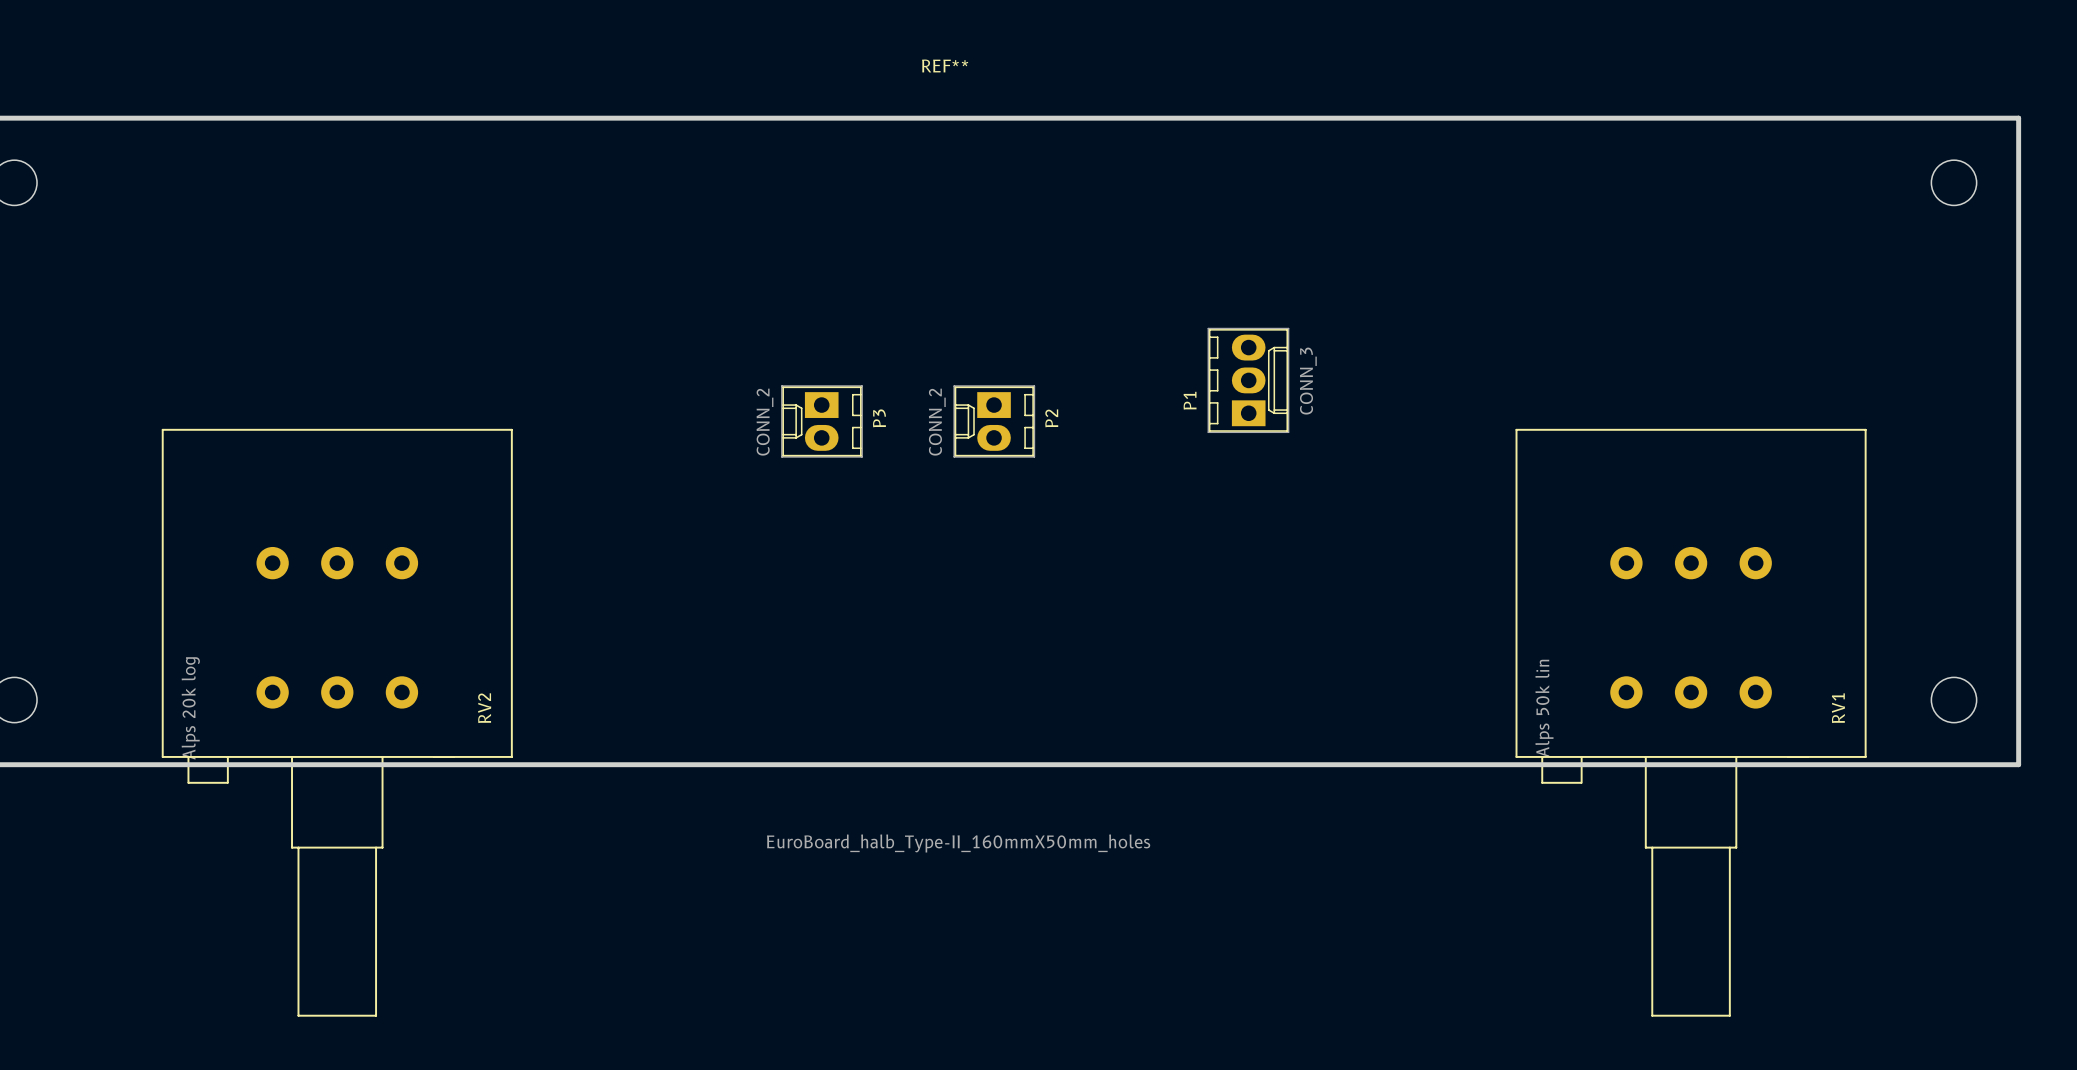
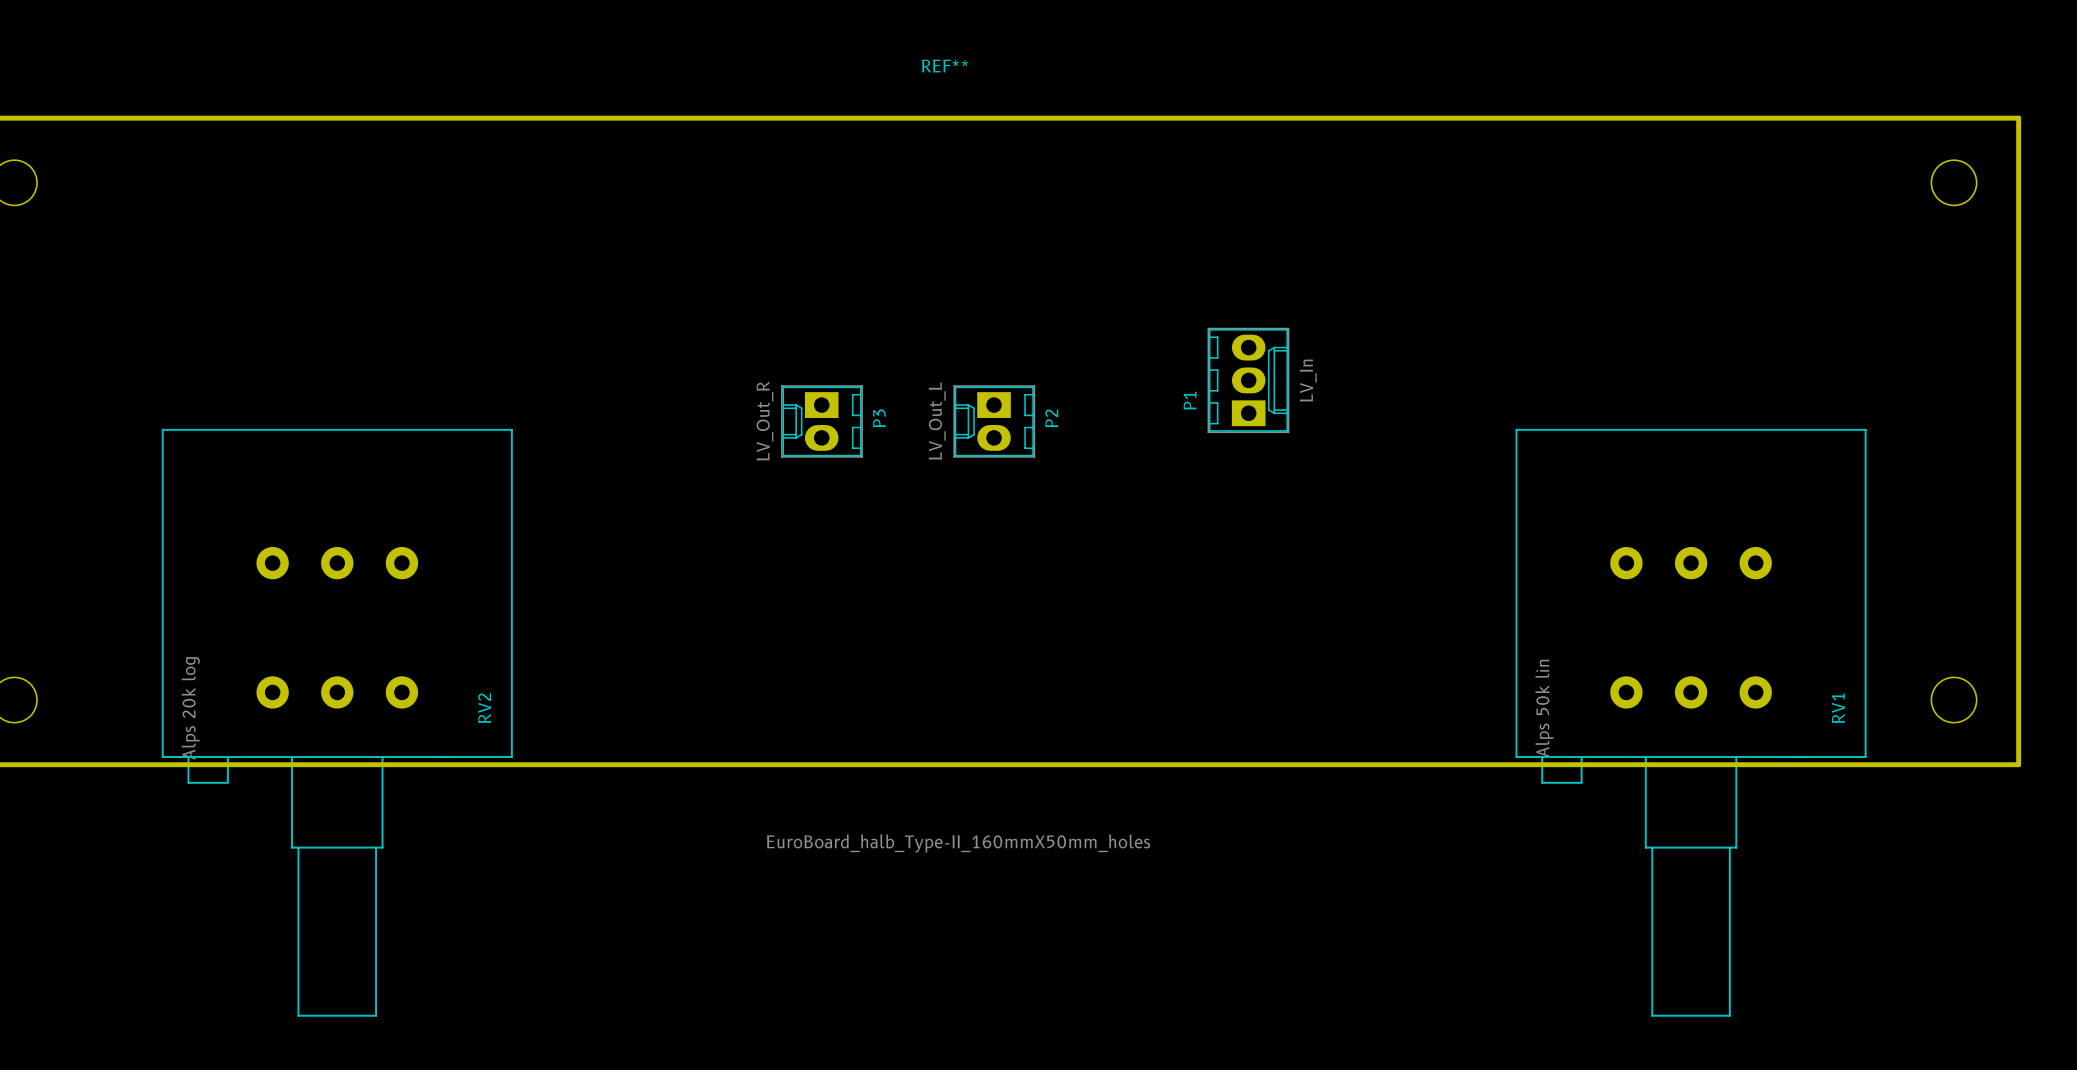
P1 value: CONN_3 (1308, 381) -> LV_In (1308, 380)
P3 value: CONN_2 (765, 422) -> LV_Out_R (765, 421)
P2 value: CONN_2 (937, 422) -> LV_Out_L (937, 421)

